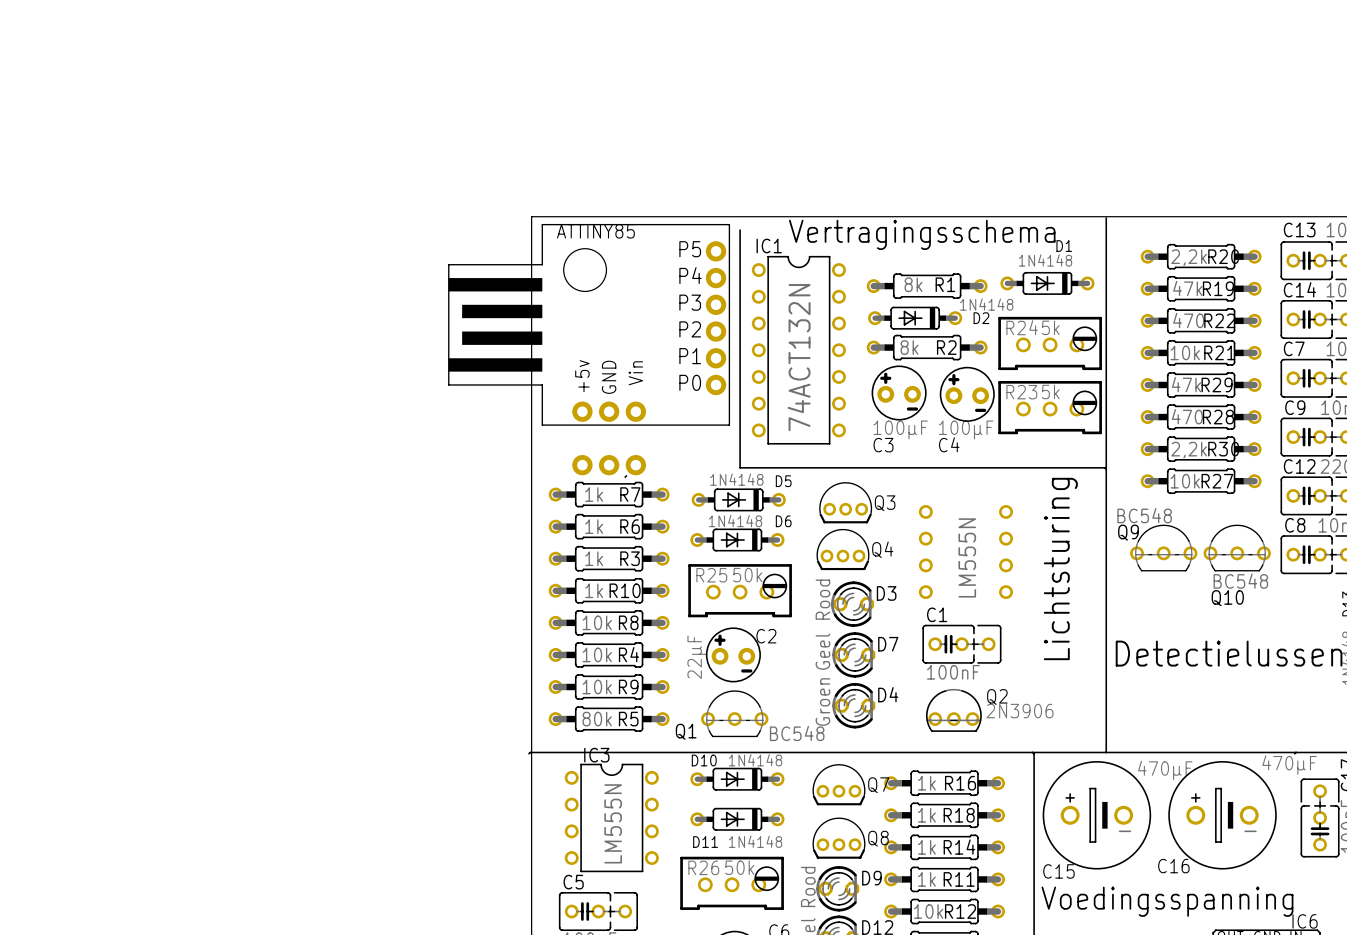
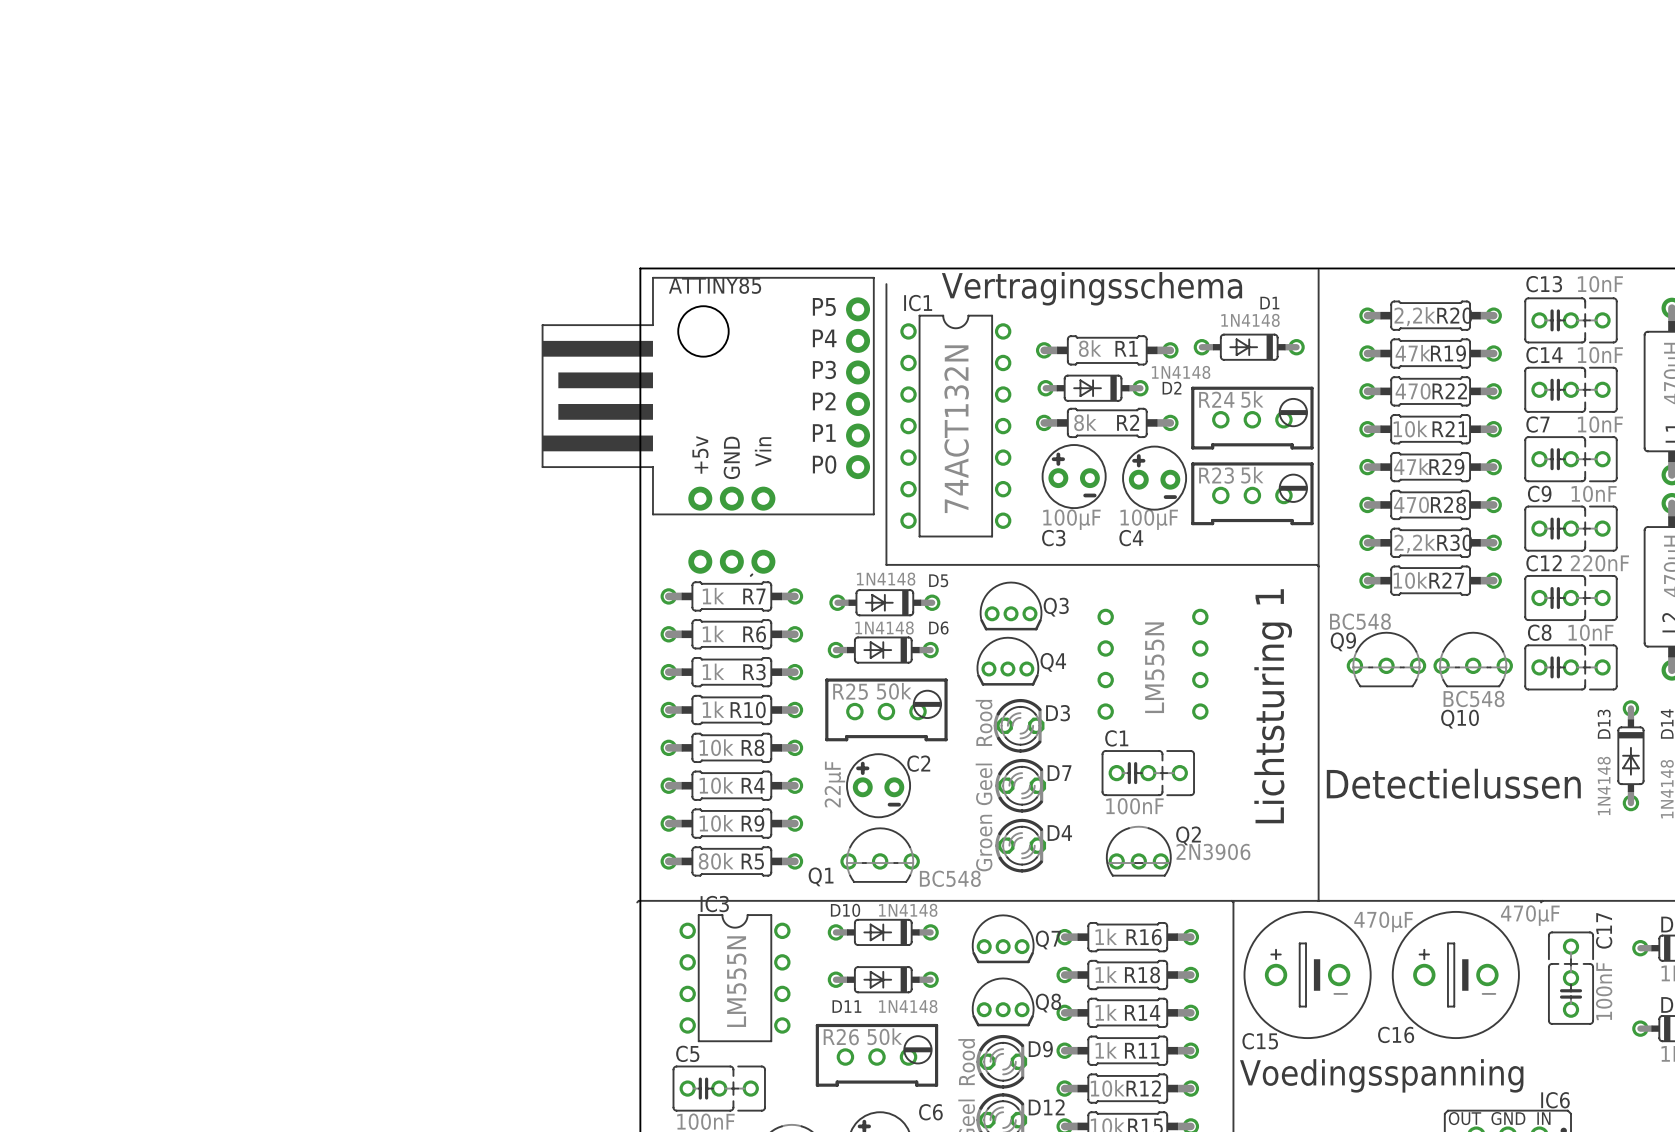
text: Lichtsturing (1060, 568) -> Lichtsturing 1 (1273, 706)

